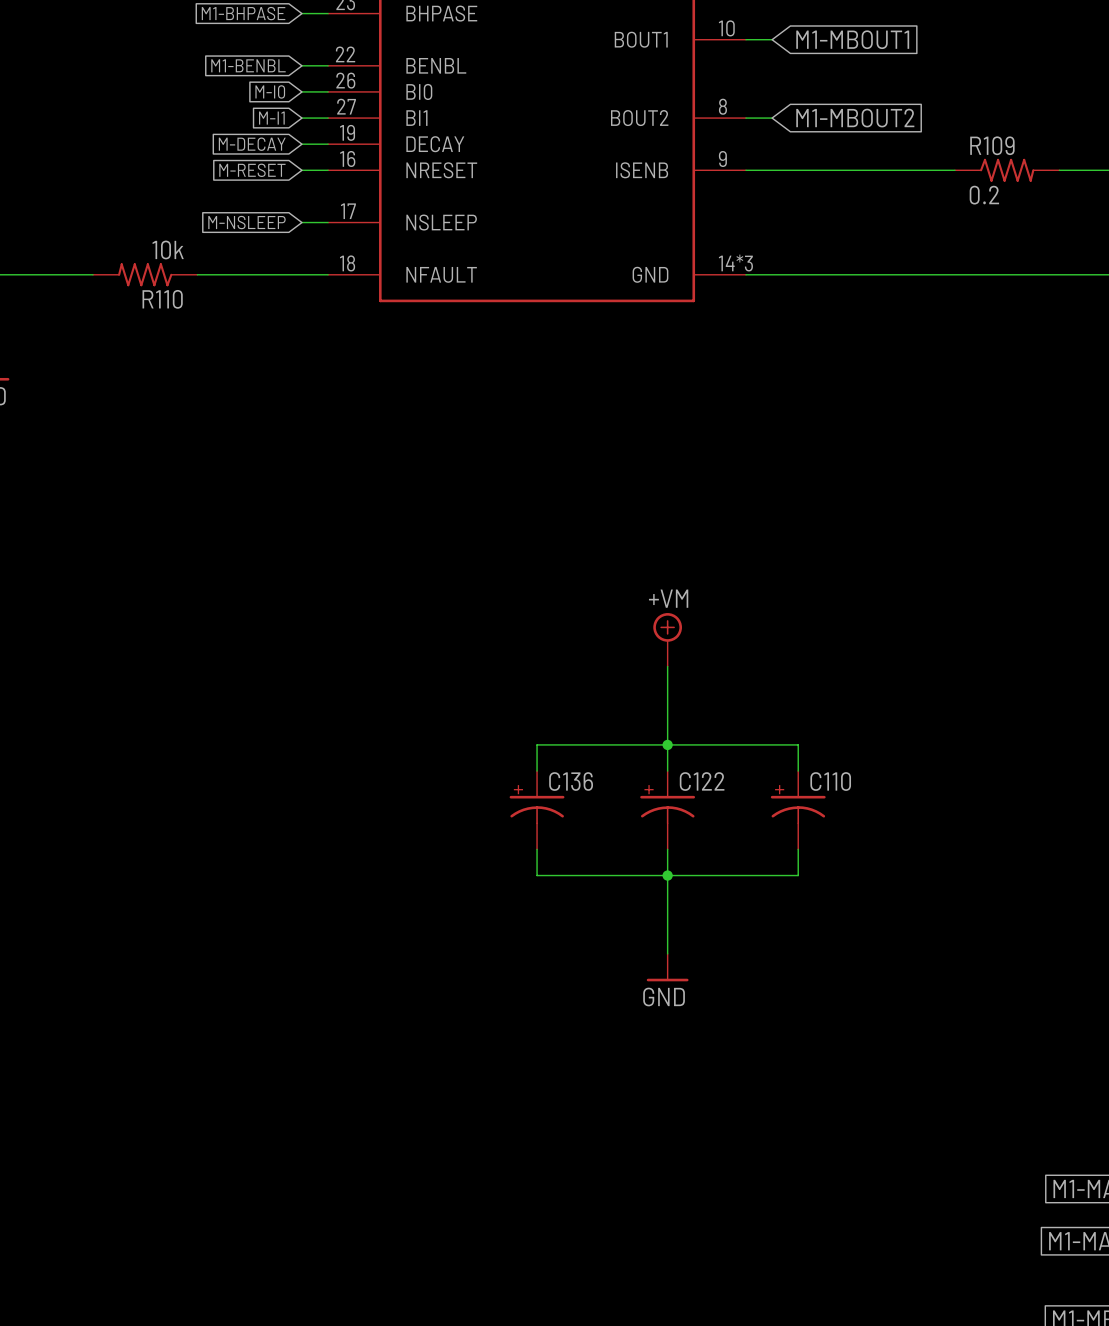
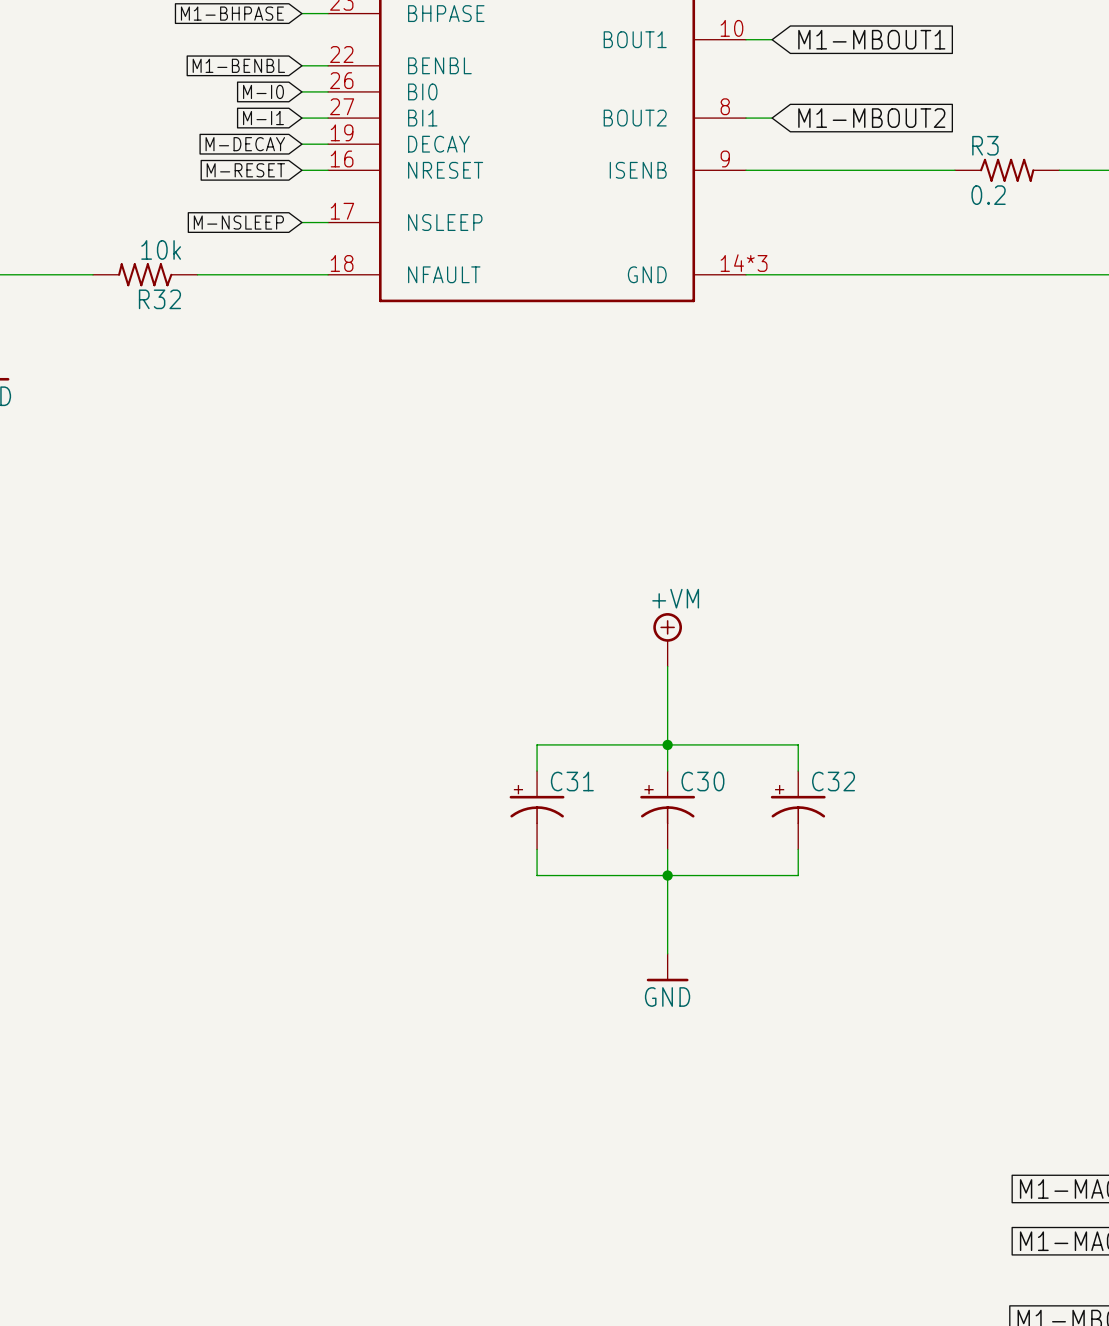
R109 name: R109 (992, 145) -> R3 (985, 145)
R110 name: R110 (162, 299) -> R32 (159, 299)
C136 name: C136 (571, 781) -> C31 (572, 781)
C122 name: C122 (702, 781) -> C30 (702, 781)
C110 name: C110 (830, 781) -> C32 (833, 781)

